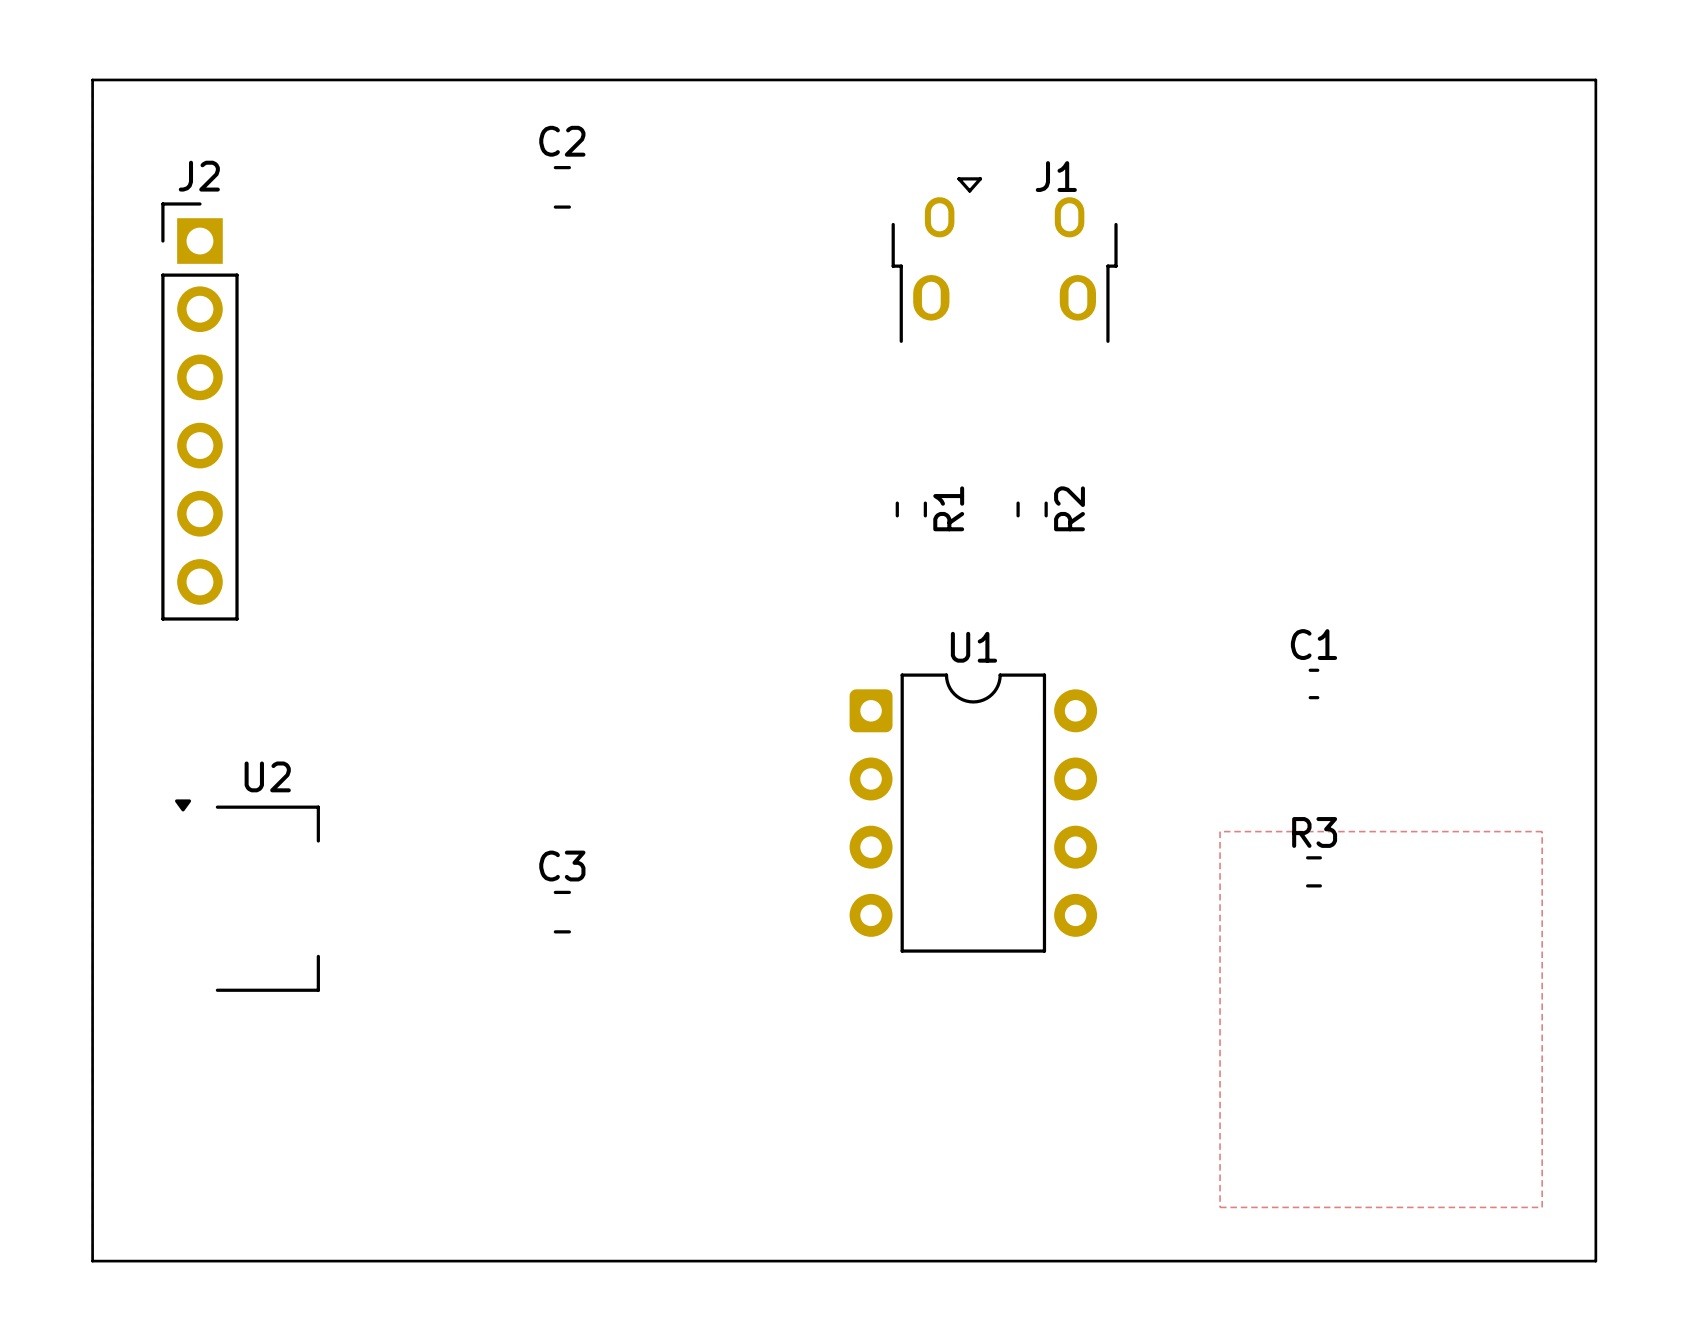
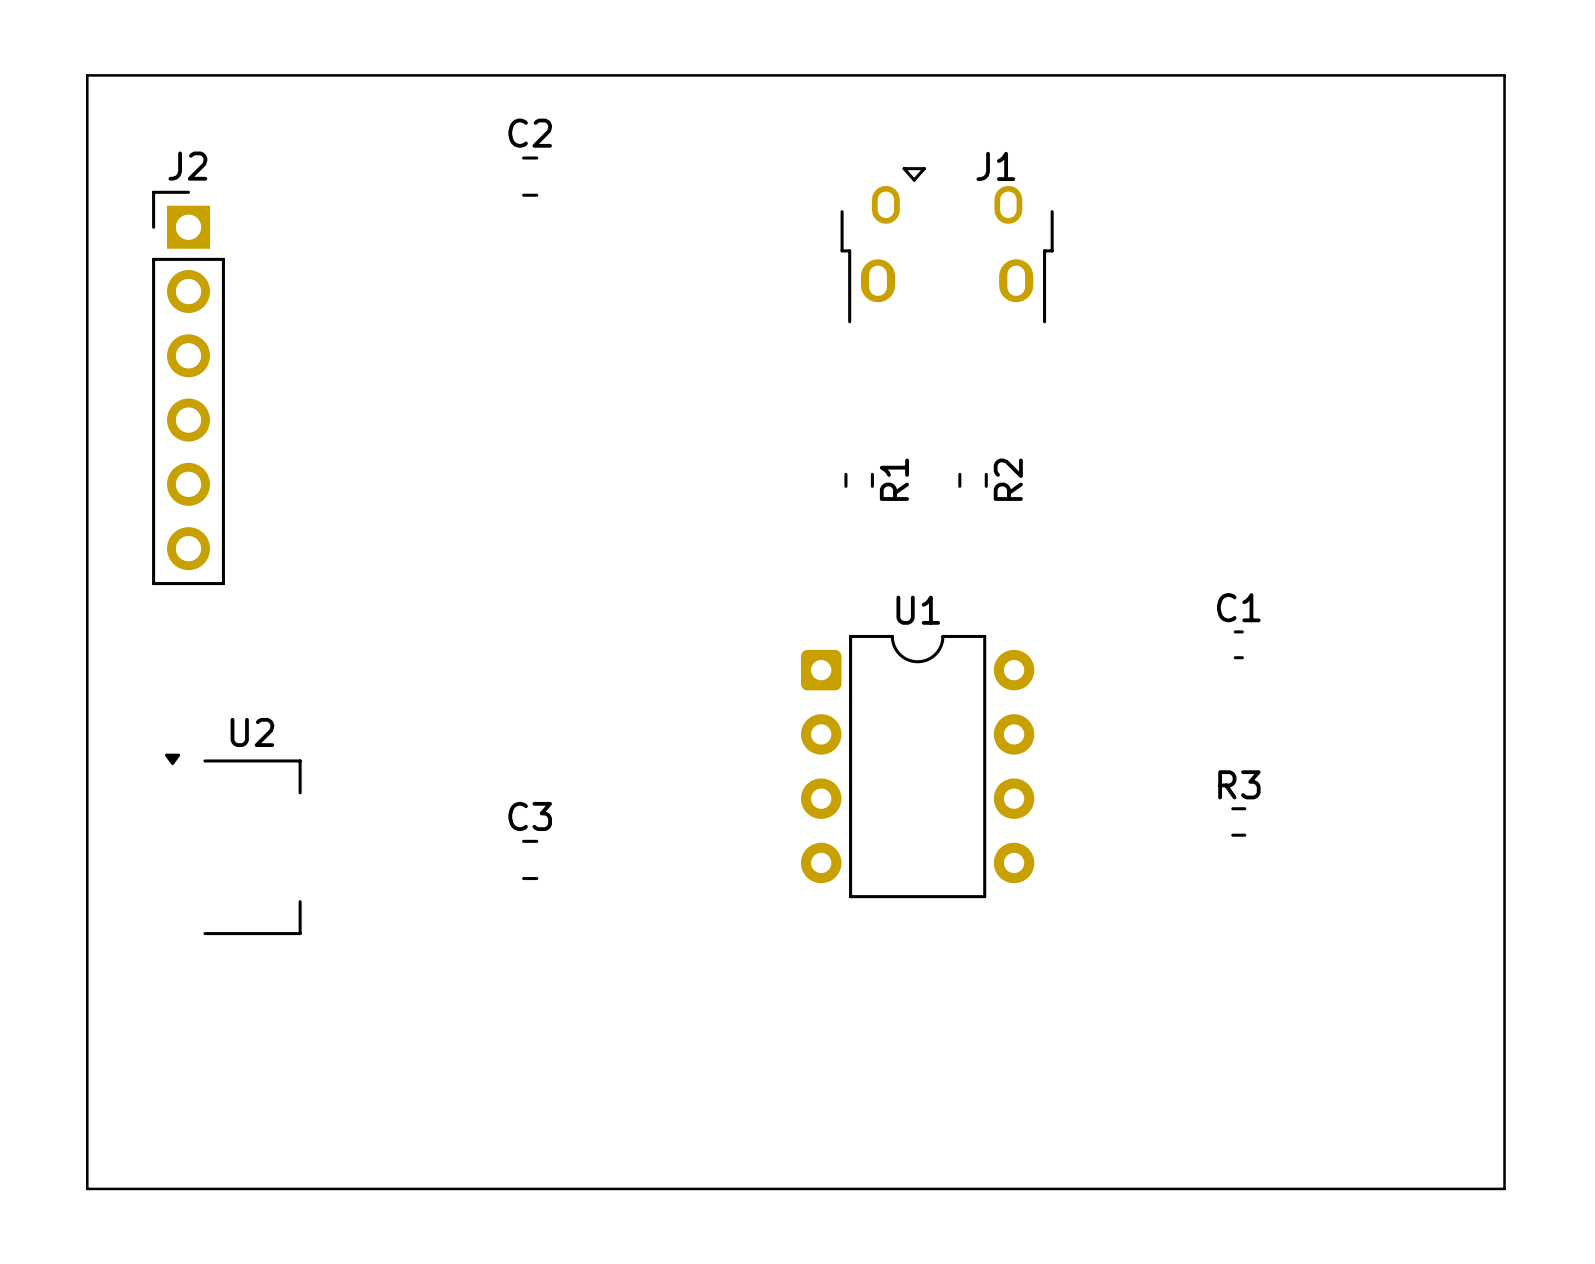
zone outline: (1220, 831) (1542, 831) (1542, 1207) (1220, 1207) (1220, 831) -> none

